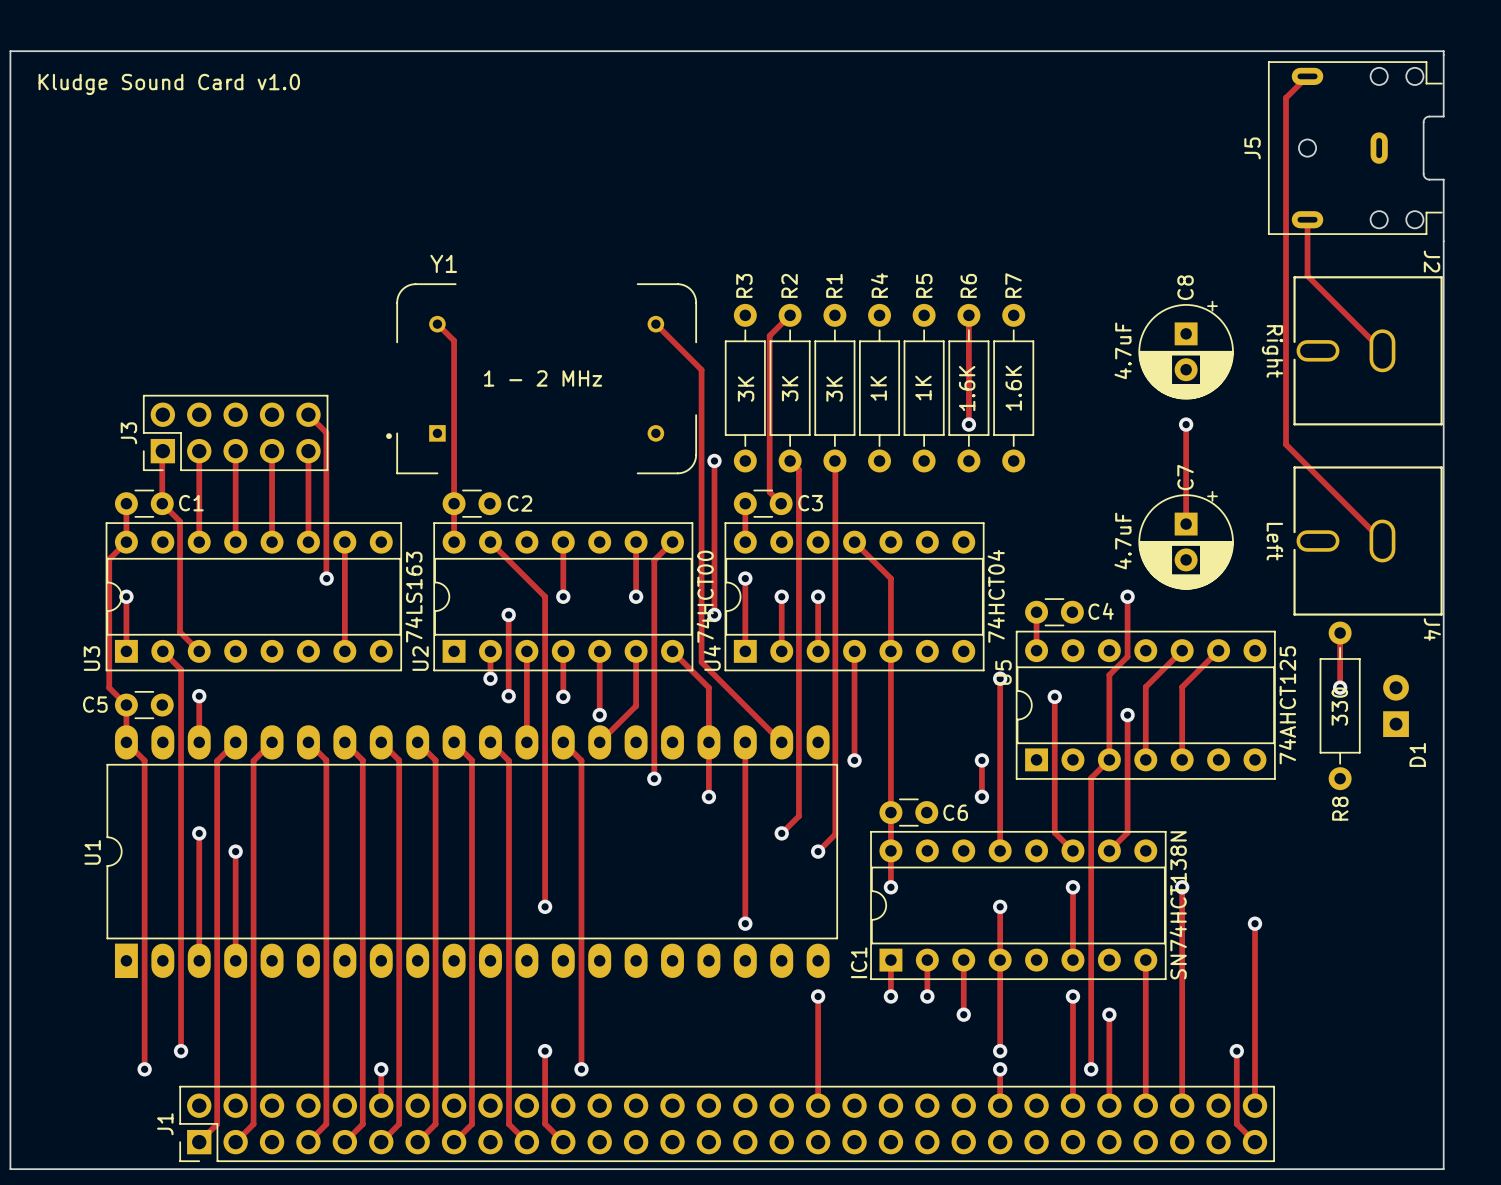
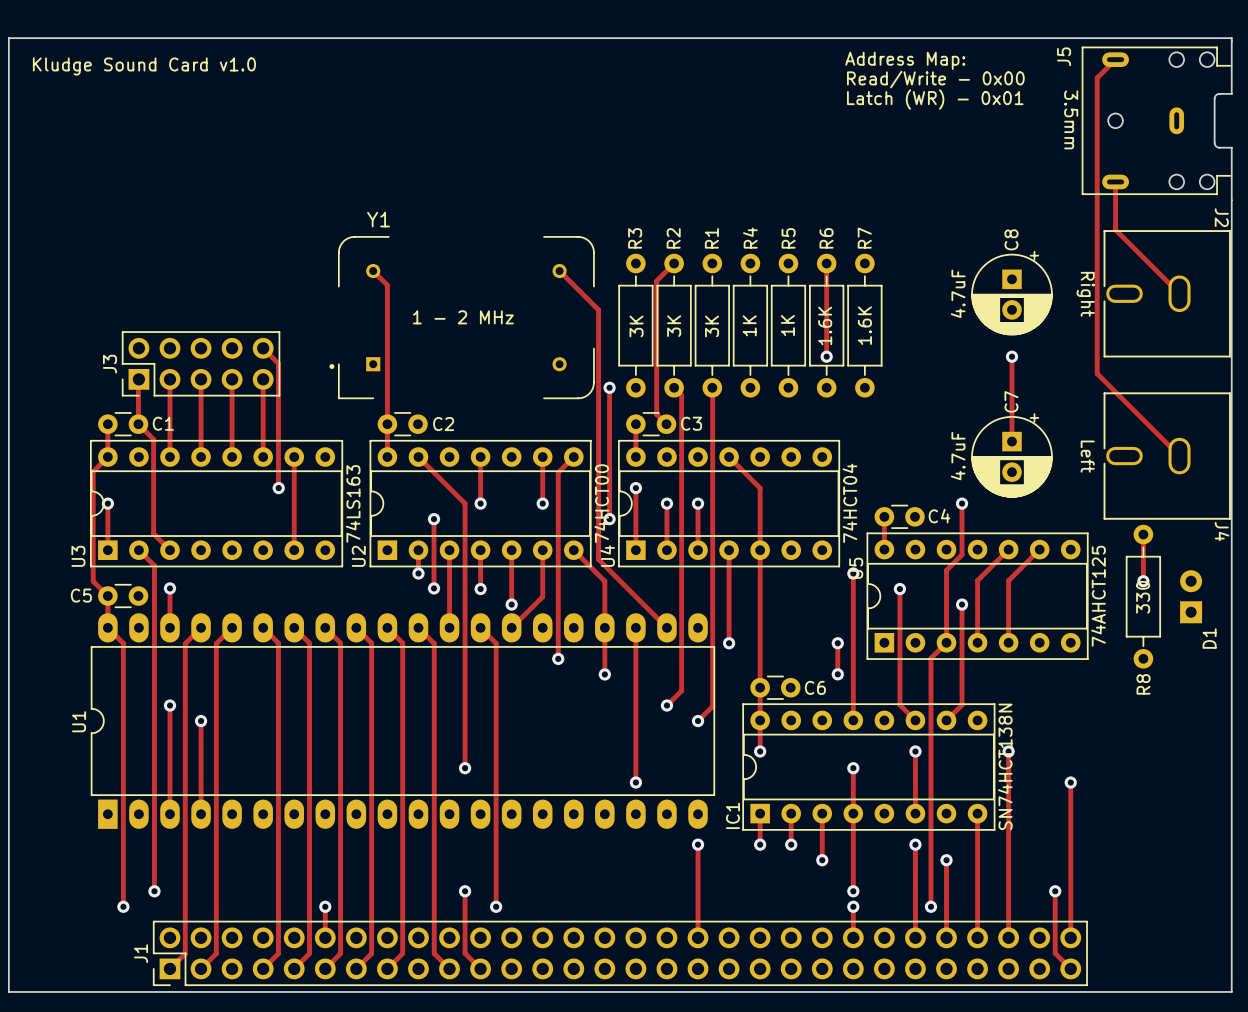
text: none -> Address Map: (905, 60)
text: none -> Read/Write - 0x00 (935, 79)
text: none -> Latch (WR) - 0x01 (935, 99)
text: none -> 3.5mm (1071, 119)
J5 name position: J5 (1252, 148) -> J5 (1064, 56)

